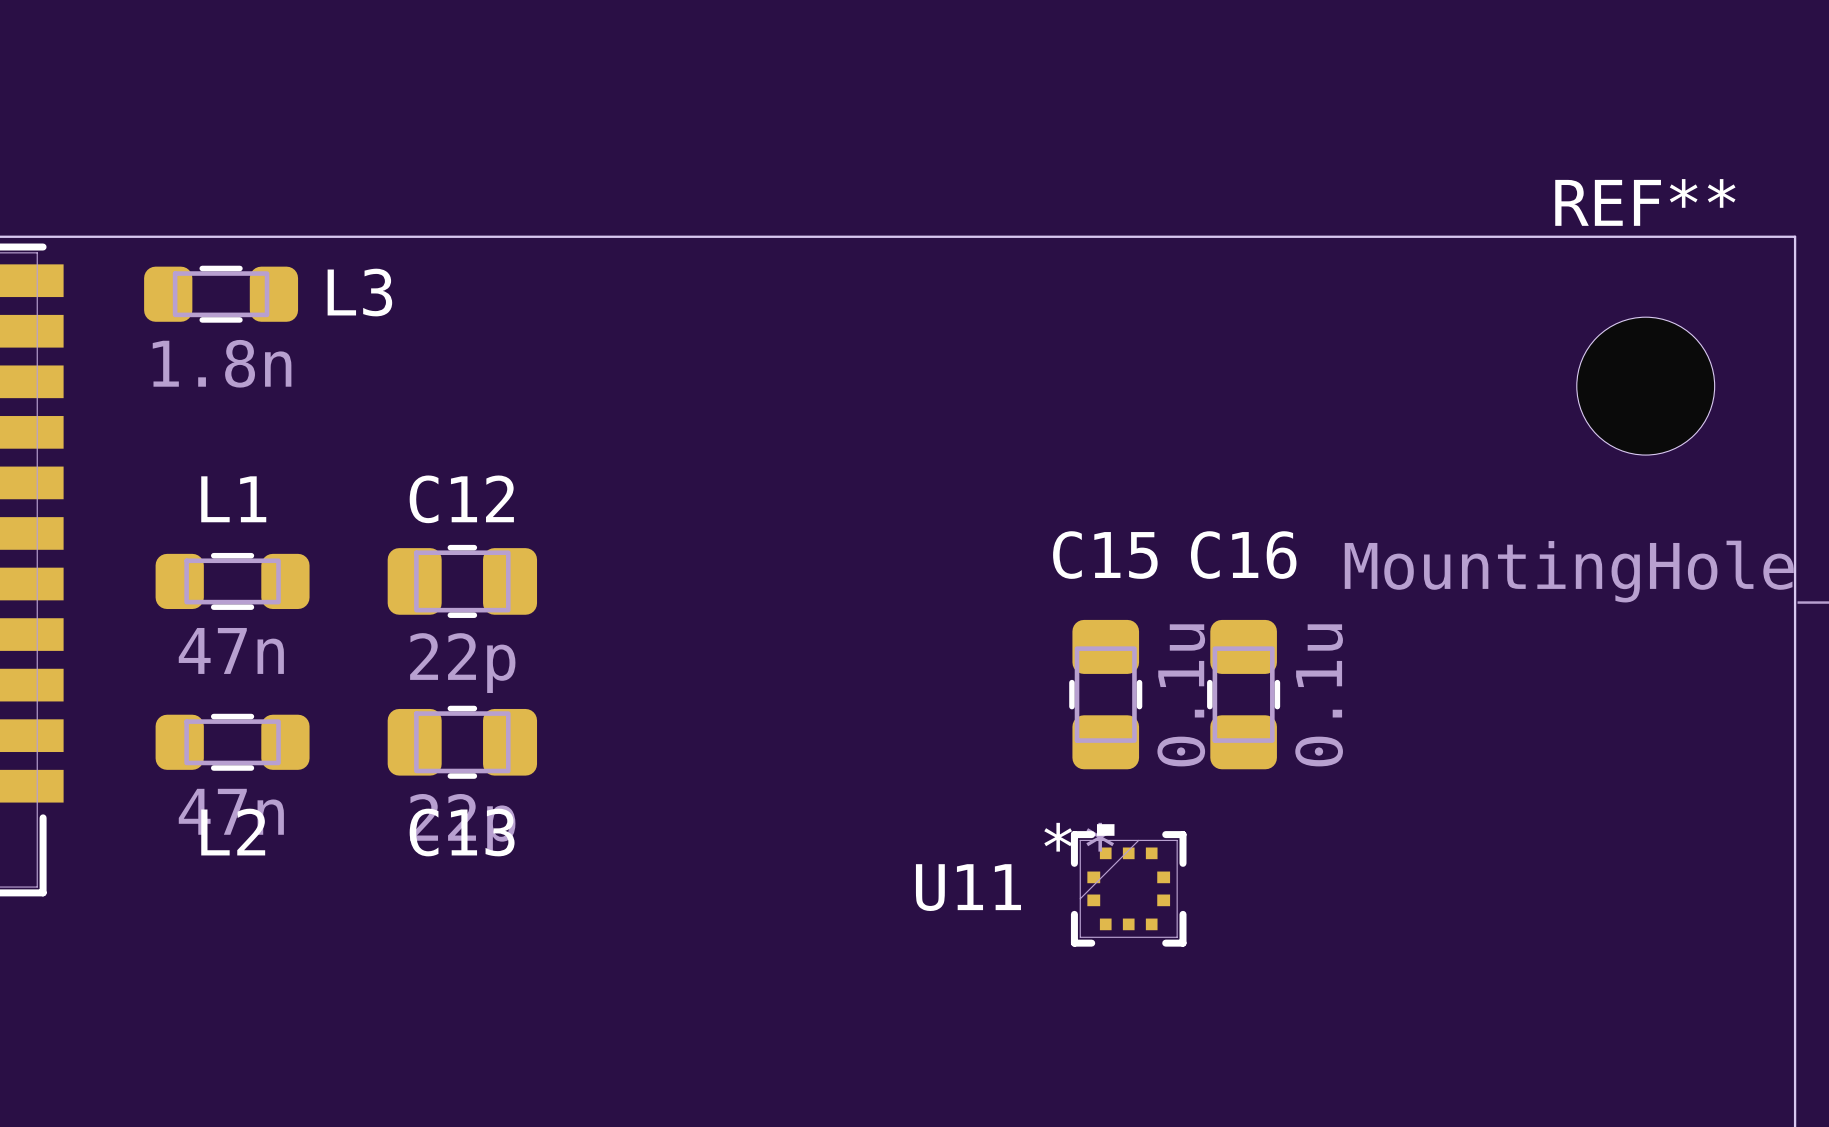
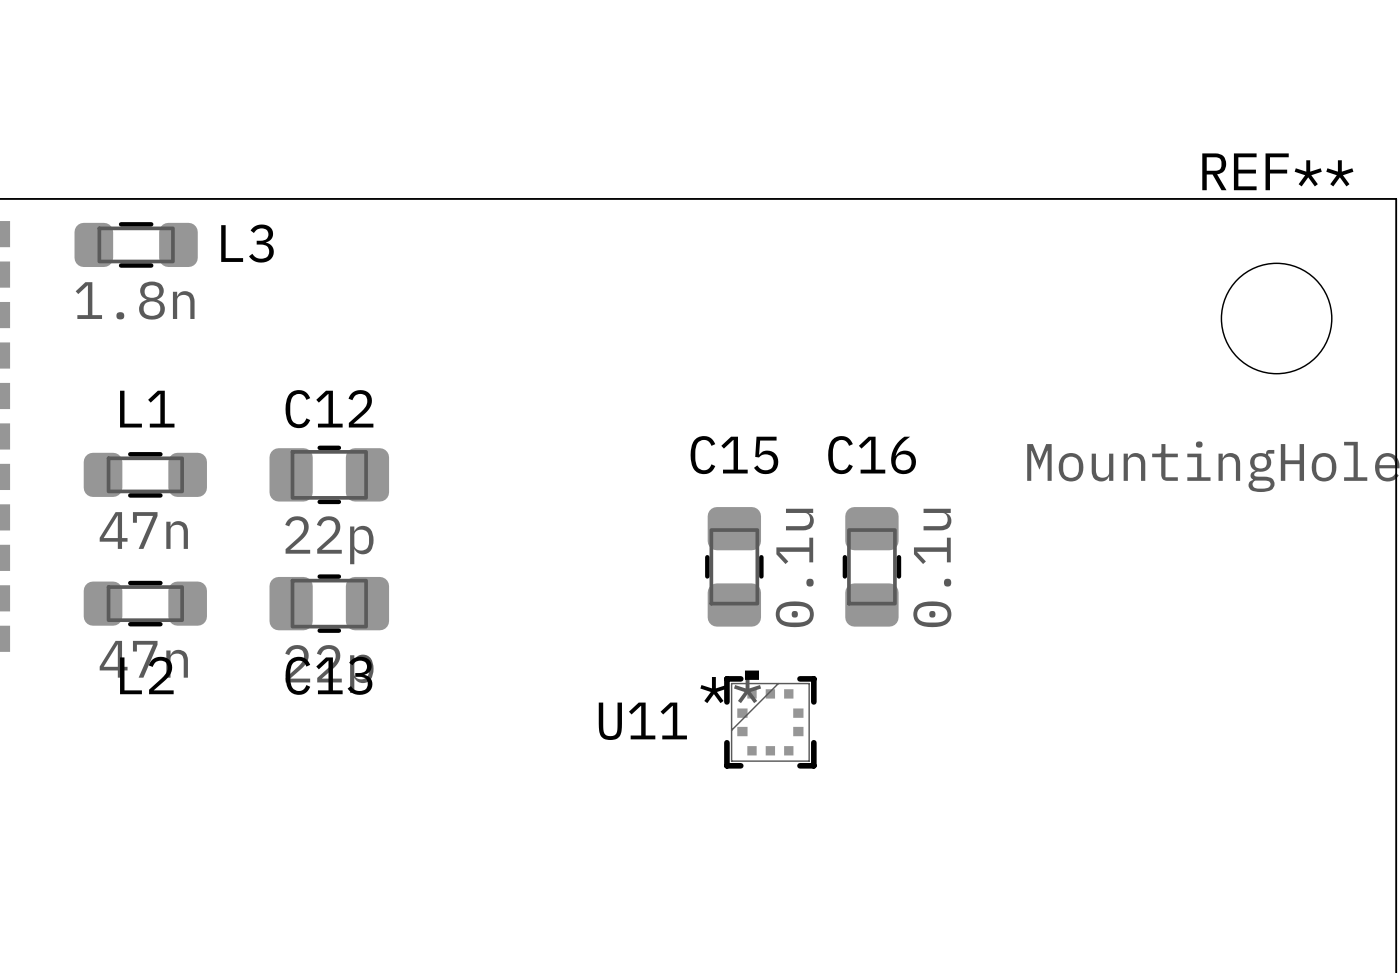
C15 position: (1105, 694) -> (734, 566)
C16 position: (1243, 694) -> (871, 566)
U11 position: (1128, 885) -> (770, 719)

